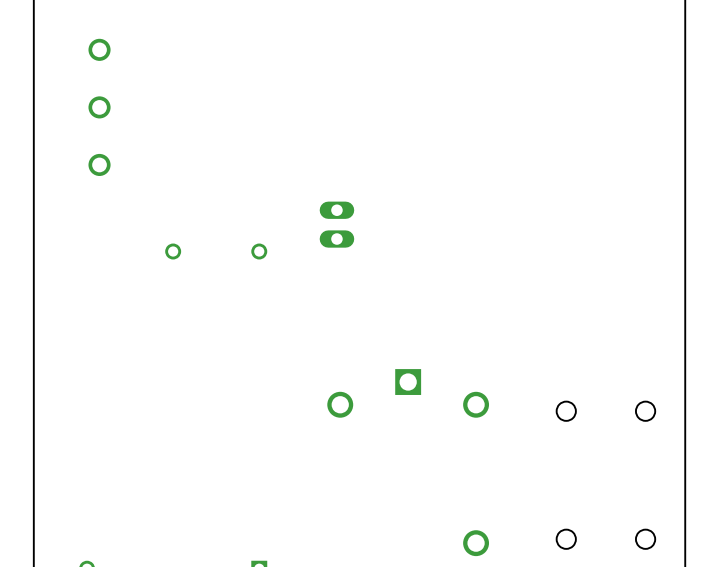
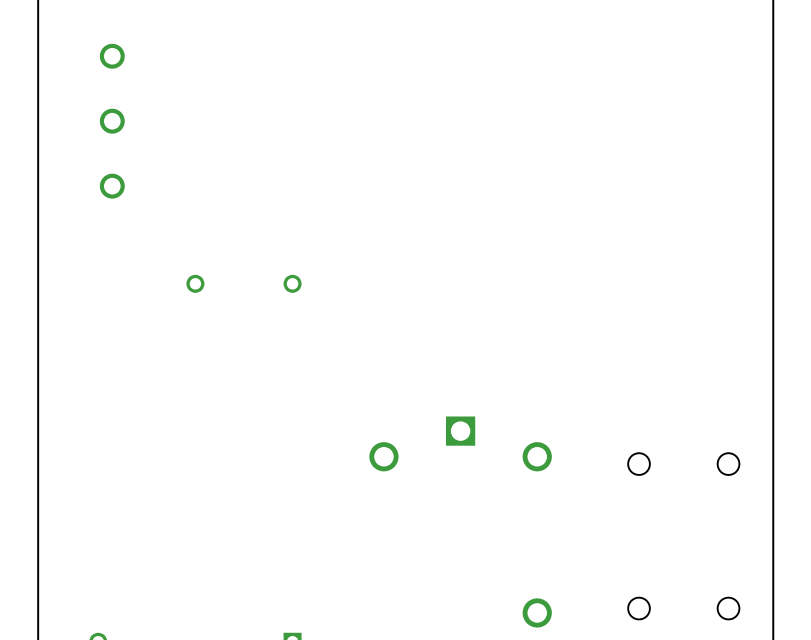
part: (336, 224) -> none

